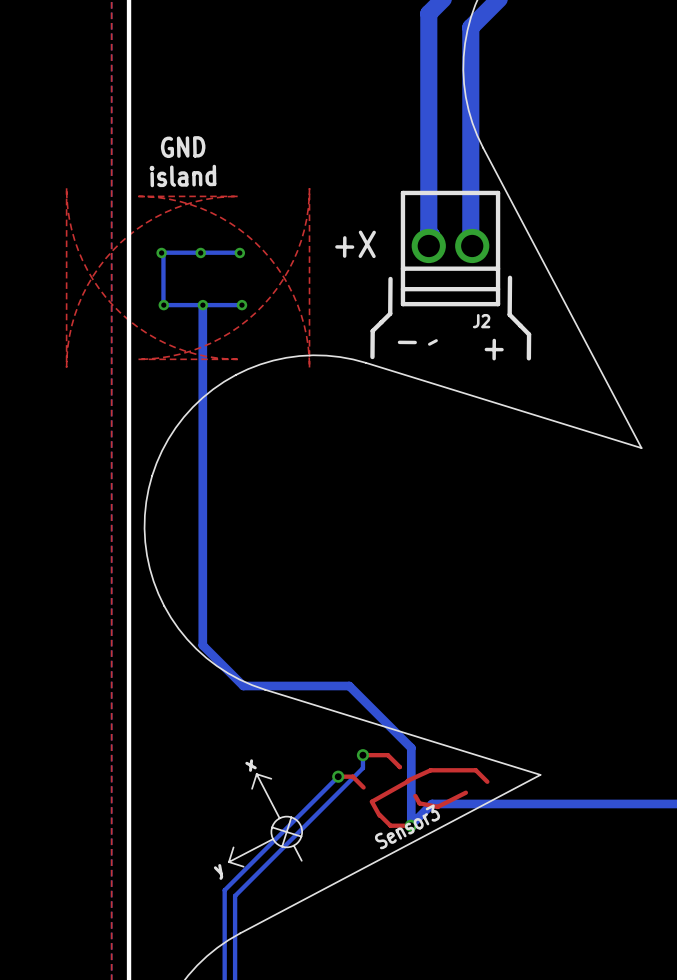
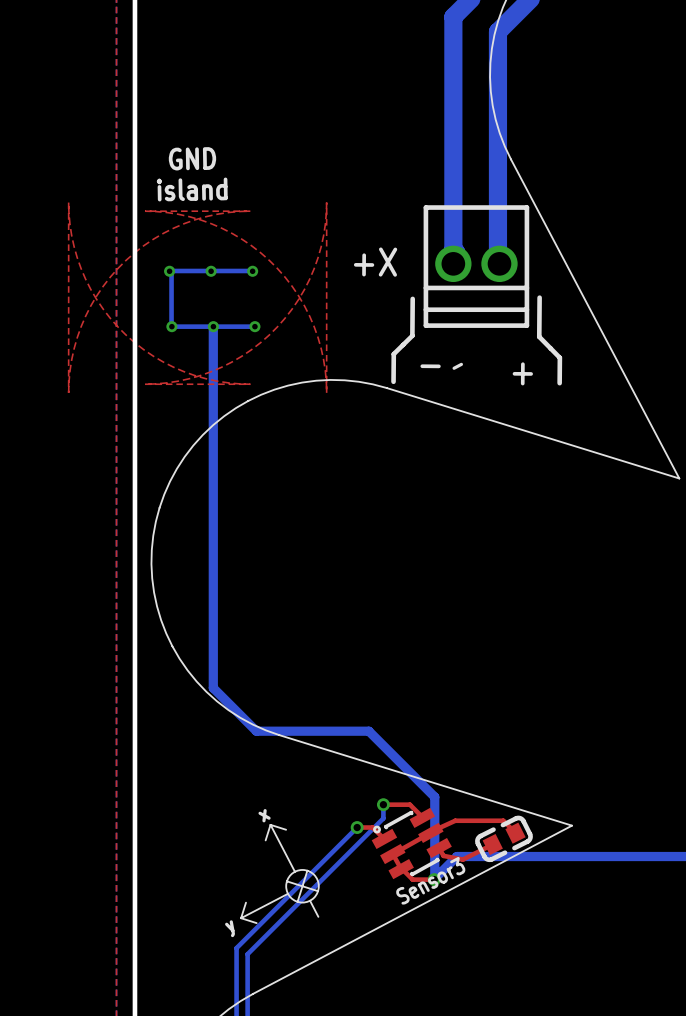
J2 name: J2 (481, 321) -> none
part: none -> (503, 838)
part: none -> (411, 843)

